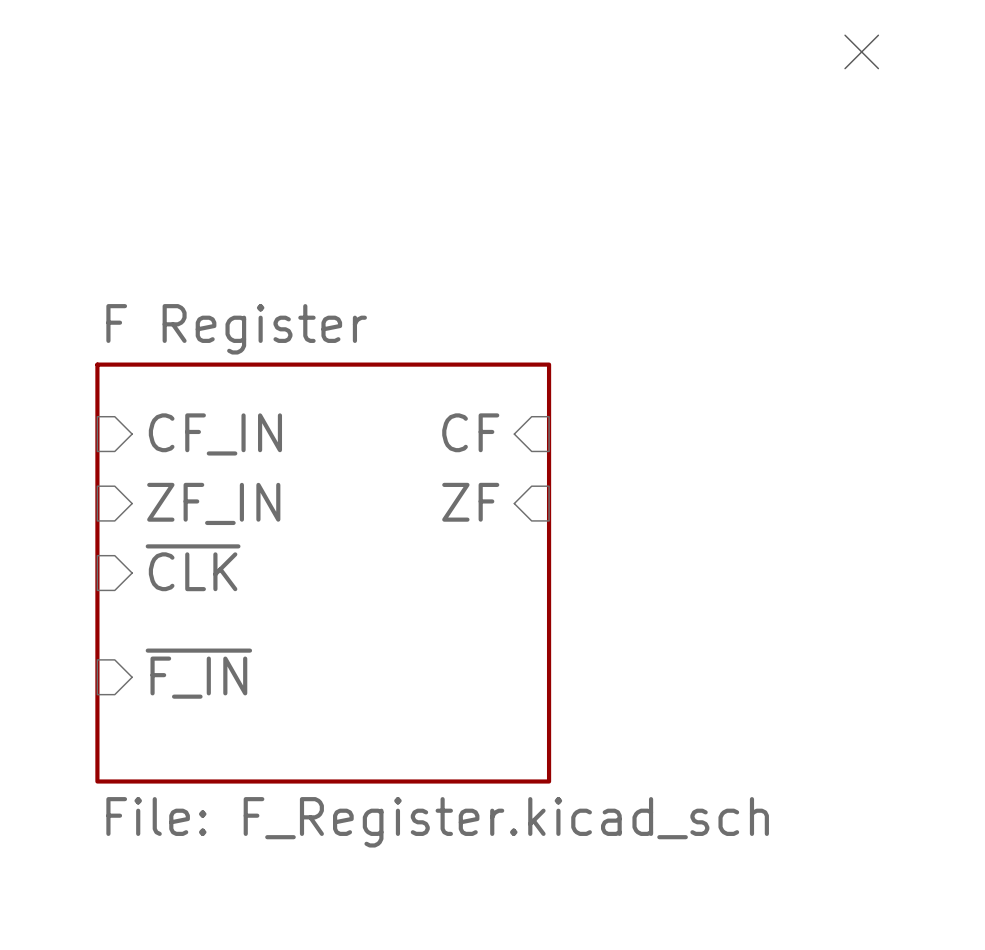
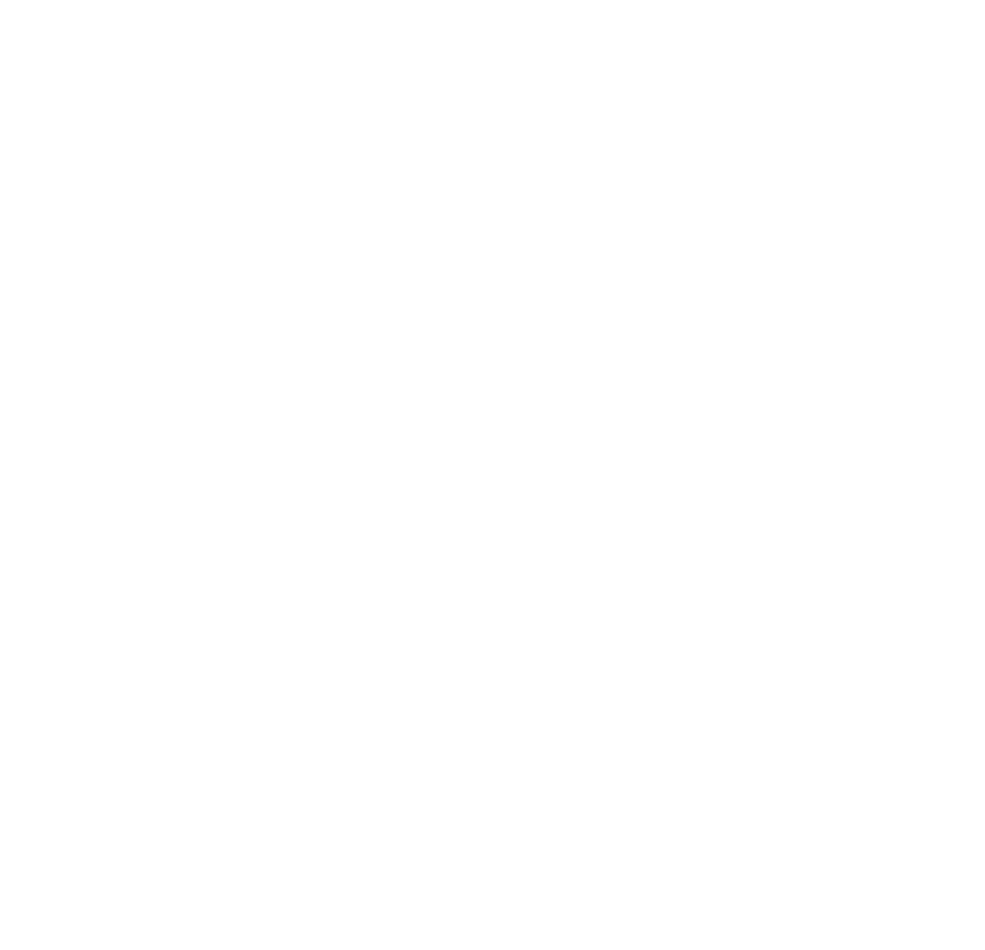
no-connect mark: (861, 51) -> none
sheet pin: CF (470, 432) -> none
sheet pin: CF_IN (215, 434) -> none
sheet pin: ZF (470, 502) -> none
sheet pin: ZF_IN (213, 503) -> none
sheet pin: ~{CLK} (193, 567) -> none
sheet F Register: File: F_Register.kicad_sch (323, 573) -> none
sheet pin: ~{F_IN} (198, 673) -> none

